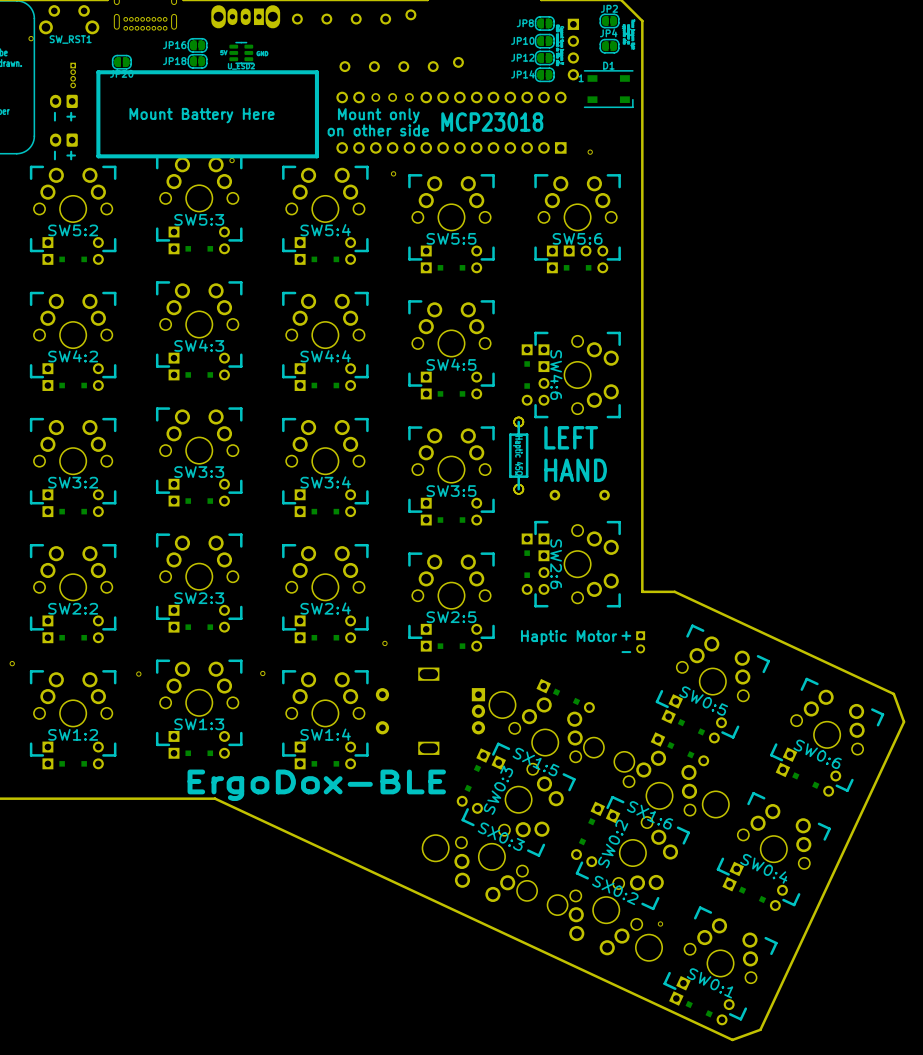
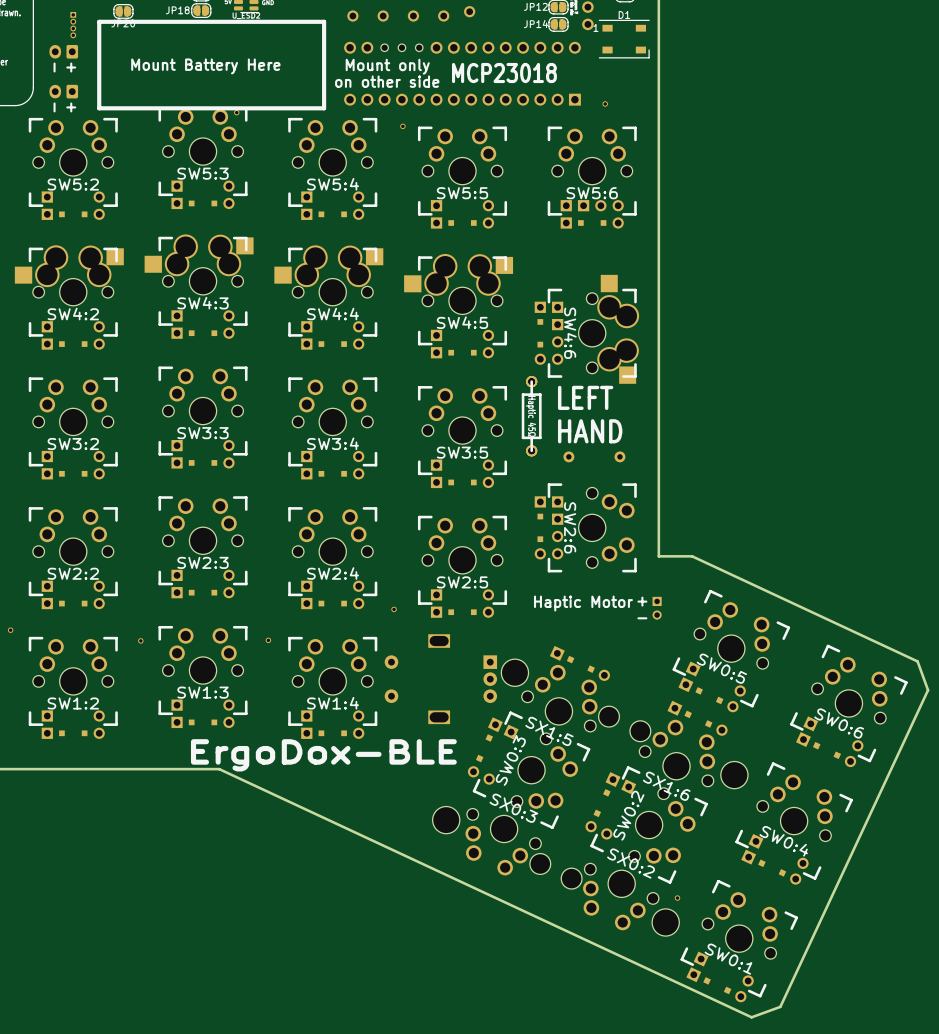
part footprint: [155, 281, 243, 381] -> [144, 234, 254, 339]
part footprint: [29, 291, 117, 391] -> [14, 245, 124, 350]
part footprint: [282, 291, 369, 391] -> [274, 245, 384, 350]
part footprint: [408, 300, 495, 400] -> [404, 253, 514, 359]
part footprint: [521, 331, 621, 419] -> [534, 274, 640, 384]

